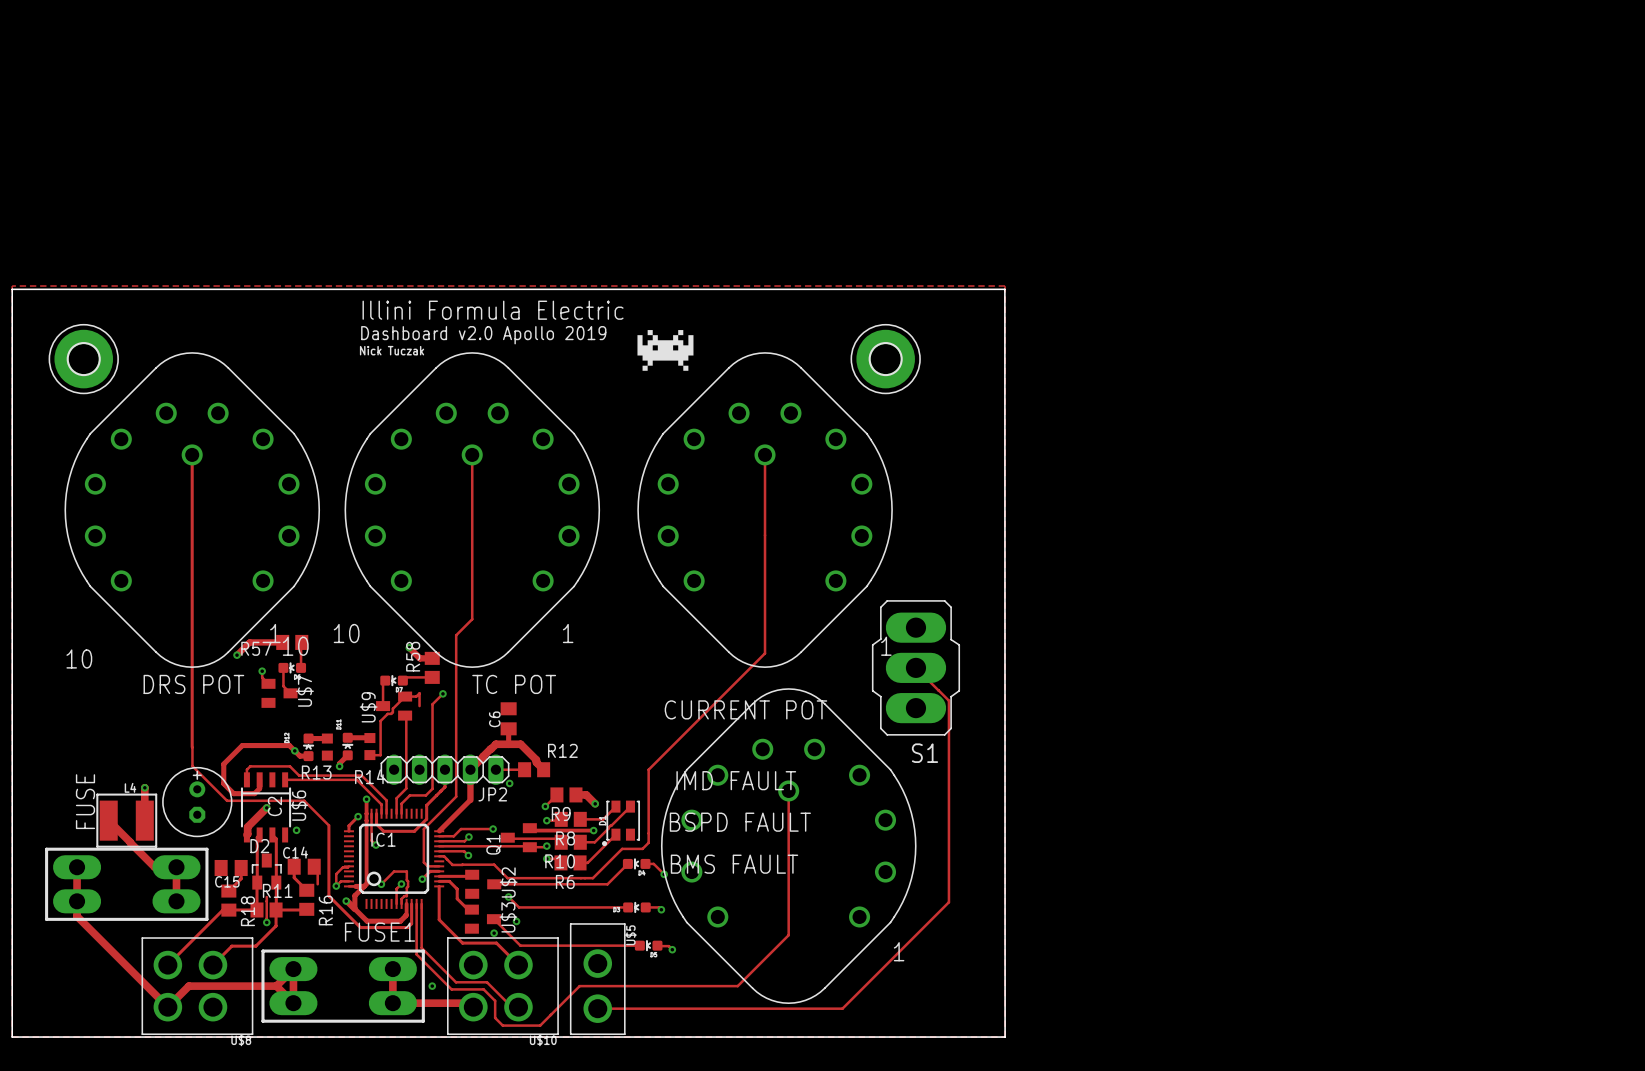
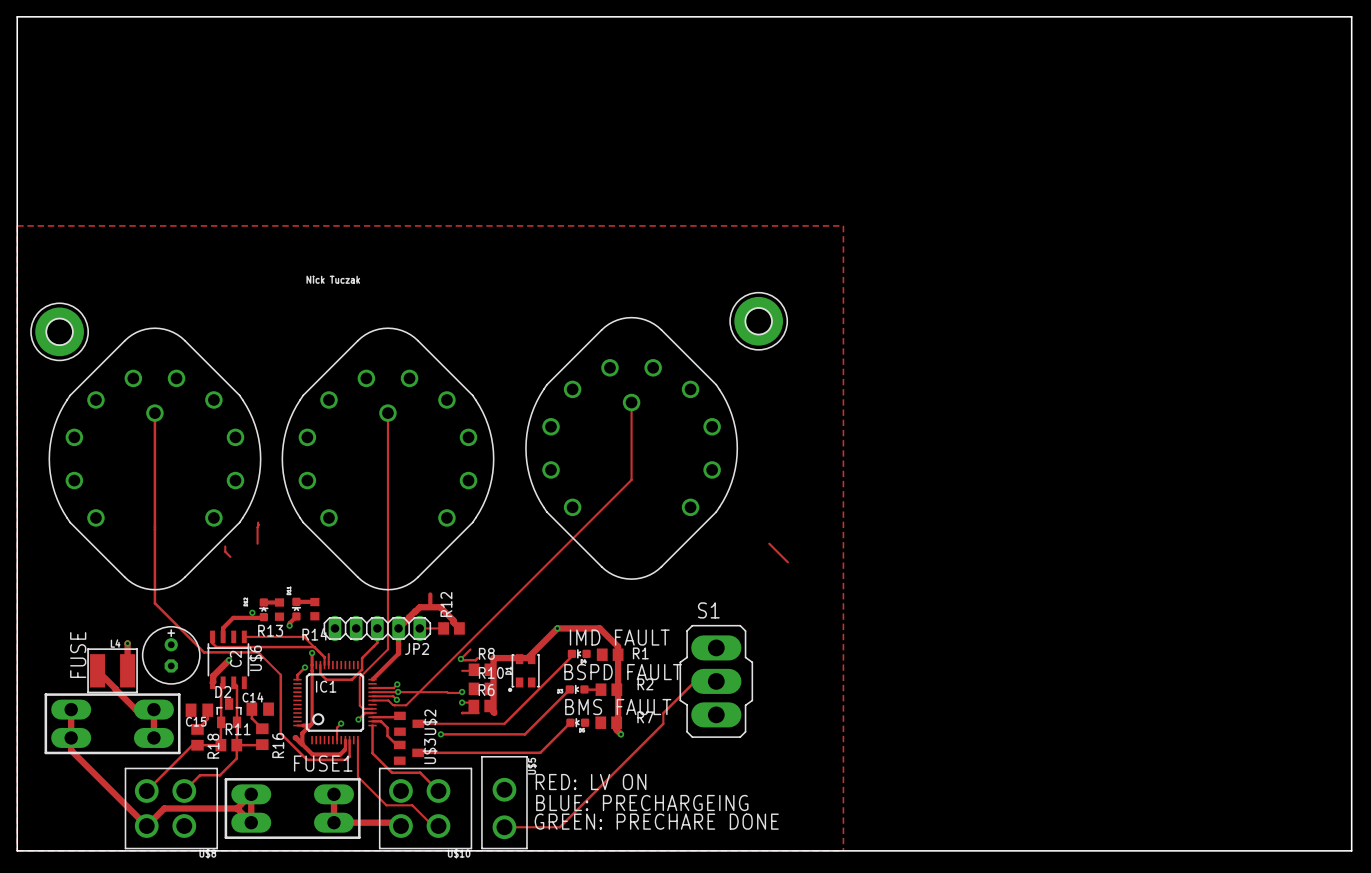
board edge: (12, 289) (1004, 289) (1005, 1037) -> (17, 228) (17, 16) (1351, 16) (1351, 850) (843, 850)
text: Illini Formula Electric (493, 310) -> none
drawing: [637, 330, 694, 371] -> none
text: Dashboard v2.0 Apollo 2019 (483, 335) -> none
part position: (83, 359) -> (59, 331)
part position: (885, 359) -> (758, 321)
track: (192, 454) (192, 766) (227, 800) (304, 800) -> (154, 413) (154, 603) (204, 652) (258, 652) (260, 654)
track: (472, 454) (472, 619) (456, 635) (456, 796) (423, 829) -> (387, 413) (387, 649) (359, 677)
track: (765, 454) (765, 653) (648, 769) (648, 842) (642, 848) (622, 848) (592, 878) (507, 878) (494, 864) (452, 864) (444, 856) -> (631, 402) (631, 479) (406, 705) (393, 705) (388, 700) (376, 700)
part position: (192, 510) -> (154, 458)
part position: (472, 510) -> (388, 458)
part position: (765, 510) -> (631, 448)
text: 1 (275, 633) -> none
text: 10 (346, 633) -> none
text: 1 (568, 633) -> none
track: (282, 642) (249, 642) (237, 655) -> none
R57: (292, 642) -> none
text: 10 (295, 646) -> none
text: 1 (886, 646) -> none
track: (409, 647) (419, 658) (432, 658) -> none
via: (409, 647) -> none
via: (237, 655) -> none
text: 10 (79, 658) -> none
track: (283, 667) (283, 686) (290, 693) -> none
part: (292, 667) -> none
R58: (432, 667) -> none
S1 rotation: 0° (915, 667) -> 180° (716, 681)
S1 position: (915, 667) -> (716, 681)
via: (262, 671) -> none
track: (432, 677) (406, 677) (402, 680) -> none
track: (385, 680) (383, 682) (383, 706) -> none
part: (394, 680) -> none
text: DRS POT (193, 684) -> none
text: TC POT (514, 684) -> none
track: (938, 690) (948, 700) (948, 902) (842, 1008) (664, 1008) -> (663, 723) (559, 827)
U$7: (279, 693) -> none
track: (442, 693) (432, 704) (432, 788) (425, 795) (409, 795) (401, 803) (401, 813) -> none
via: (442, 693) -> none
U$9: (394, 706) -> none
track: (419, 706) (419, 693) (416, 696) (405, 696) (392, 708) (391, 713) (387, 713) (380, 721) (380, 755) (370, 755) -> none
text: CURRENT POT (745, 709) -> none
track: (405, 715) (406, 788) (396, 798) (396, 813) -> none
C6: (508, 718) -> none
R12 name rotation: 0° (562, 750) -> 90° counterclockwise (446, 604)
track: (308, 756) (300, 756) (289, 745) (242, 745) (223, 764) (223, 783) (233, 793) (254, 793) (259, 788) (259, 779) -> (263, 617) (233, 617) (223, 628) (223, 636)
via: none -> (557, 628)
track: (246, 779) (246, 769) (250, 766) (289, 766) (299, 775) (361, 775) (386, 800) -> (212, 636) (212, 643) (216, 647) (314, 647) (324, 657)
via: (509, 783) -> none
track: (788, 790) (788, 871) -> (716, 681) (695, 681) (663, 713)
R9: (566, 794) -> none
track: (575, 794) (586, 794) (595, 803) -> none
R1: none -> (610, 654)
via: (595, 803) -> none
track: none -> (477, 658) (475, 660) (462, 660)
track: (615, 806) (603, 819) (580, 819) -> none
track: (630, 806) (594, 842) (580, 842) -> none
track: (371, 813) (371, 840) (376, 845) -> none
via: (546, 820) -> none
track: (529, 828) (532, 830) (593, 830) -> none
track: (493, 829) (461, 829) (453, 836) (439, 836) -> none
via position: (493, 829) -> (398, 691)
via: (296, 830) -> none
via: (593, 830) -> none
track: (615, 834) (587, 862) (580, 862) -> none
track: (507, 837) (557, 838) (561, 842) -> none
Q1: (518, 837) -> none
R8 name position: R8 (565, 838) -> R8 (486, 653)
track: none -> (569, 689) (524, 734) (440, 734)
track: none -> (584, 689) (600, 689)
R2: none -> (608, 689)
via: (376, 845) -> none
part: (788, 846) -> none
R10 name position: R10 (560, 861) -> R10 (491, 672)
track: (627, 863) (607, 884) (597, 884) -> (571, 653) (571, 656) (504, 723)
part position: (636, 863) -> (579, 653)
track: (645, 863) (653, 863) (664, 874) -> none
track: (314, 866) (317, 870) (317, 884) -> none
track: (348, 866) (342, 867) (336, 874) (336, 886) (340, 881) (348, 881) -> none
track: none -> (478, 712) (462, 713)
track: none -> (494, 712) (493, 658) (527, 658) (557, 628) (599, 628) (618, 646) (616, 730) (620, 734)
via: (664, 874) -> none
R6 name position: R6 (565, 881) -> R6 (486, 690)
R7: none -> (608, 722)
track: (381, 884) (394, 871) (406, 871) (406, 896) (401, 898) (401, 903) -> none
via: (381, 884) -> none
track: (788, 884) (788, 935) (737, 986) (579, 986) (540, 1025) (502, 1025) (495, 1017) (495, 1000) (483, 989) (451, 989) (416, 954) (416, 903) -> none
via: (336, 886) -> none
track: (266, 897) (266, 922) -> none
track: (508, 897) (519, 907) (628, 907) -> none
via: (508, 897) -> none
via: none -> (440, 734)
via: none -> (620, 734)
via: (346, 901) -> none
part position: (636, 907) -> (577, 689)
track: (645, 907) (659, 907) (661, 909) -> none
via: (661, 909) -> none
track: (493, 919) (520, 945) (639, 945) -> (418, 752) (540, 752) (570, 722)
via: (516, 921) -> none
via: (266, 922) -> none
via: (494, 933) -> none
part position: (648, 945) -> (577, 722)
track: (657, 945) (669, 946) (672, 949) -> none
via: (672, 949) -> none
text: 1 (899, 951) -> none
text: none -> RED: LV ON (591, 782)
text: none -> BLUE: PRECHARGEING (642, 803)
via: (432, 986) -> none
text: none -> GREEN: PRECHARE DONE (656, 821)

